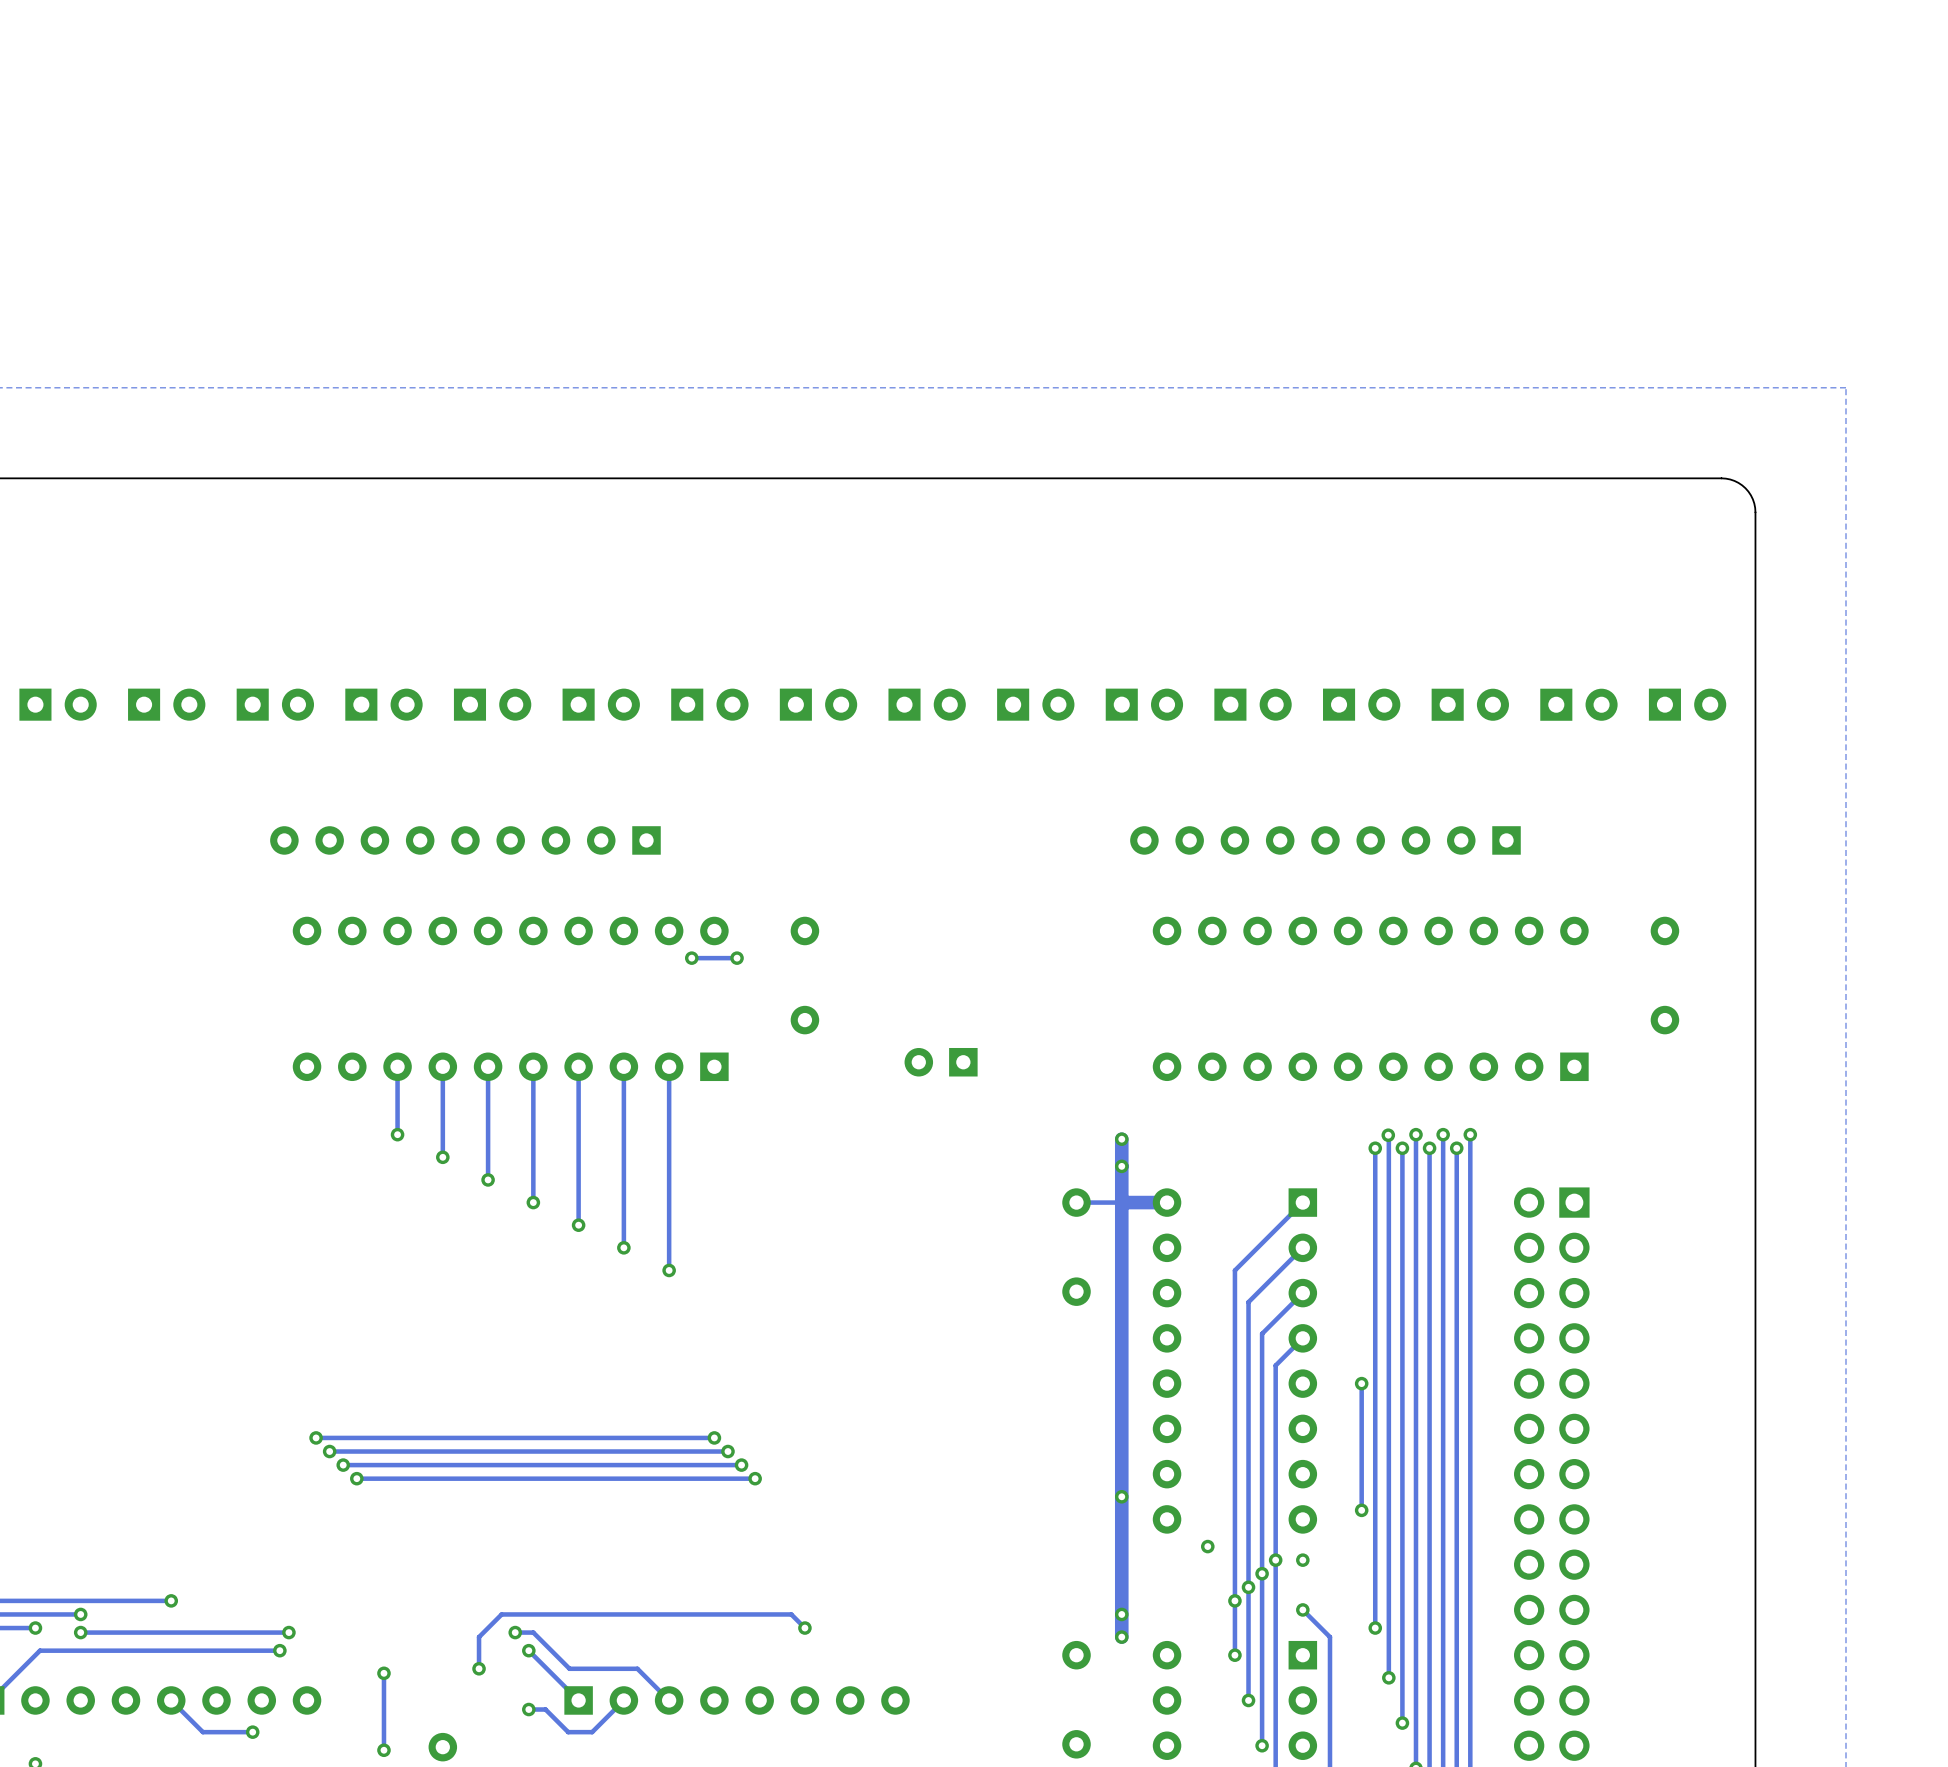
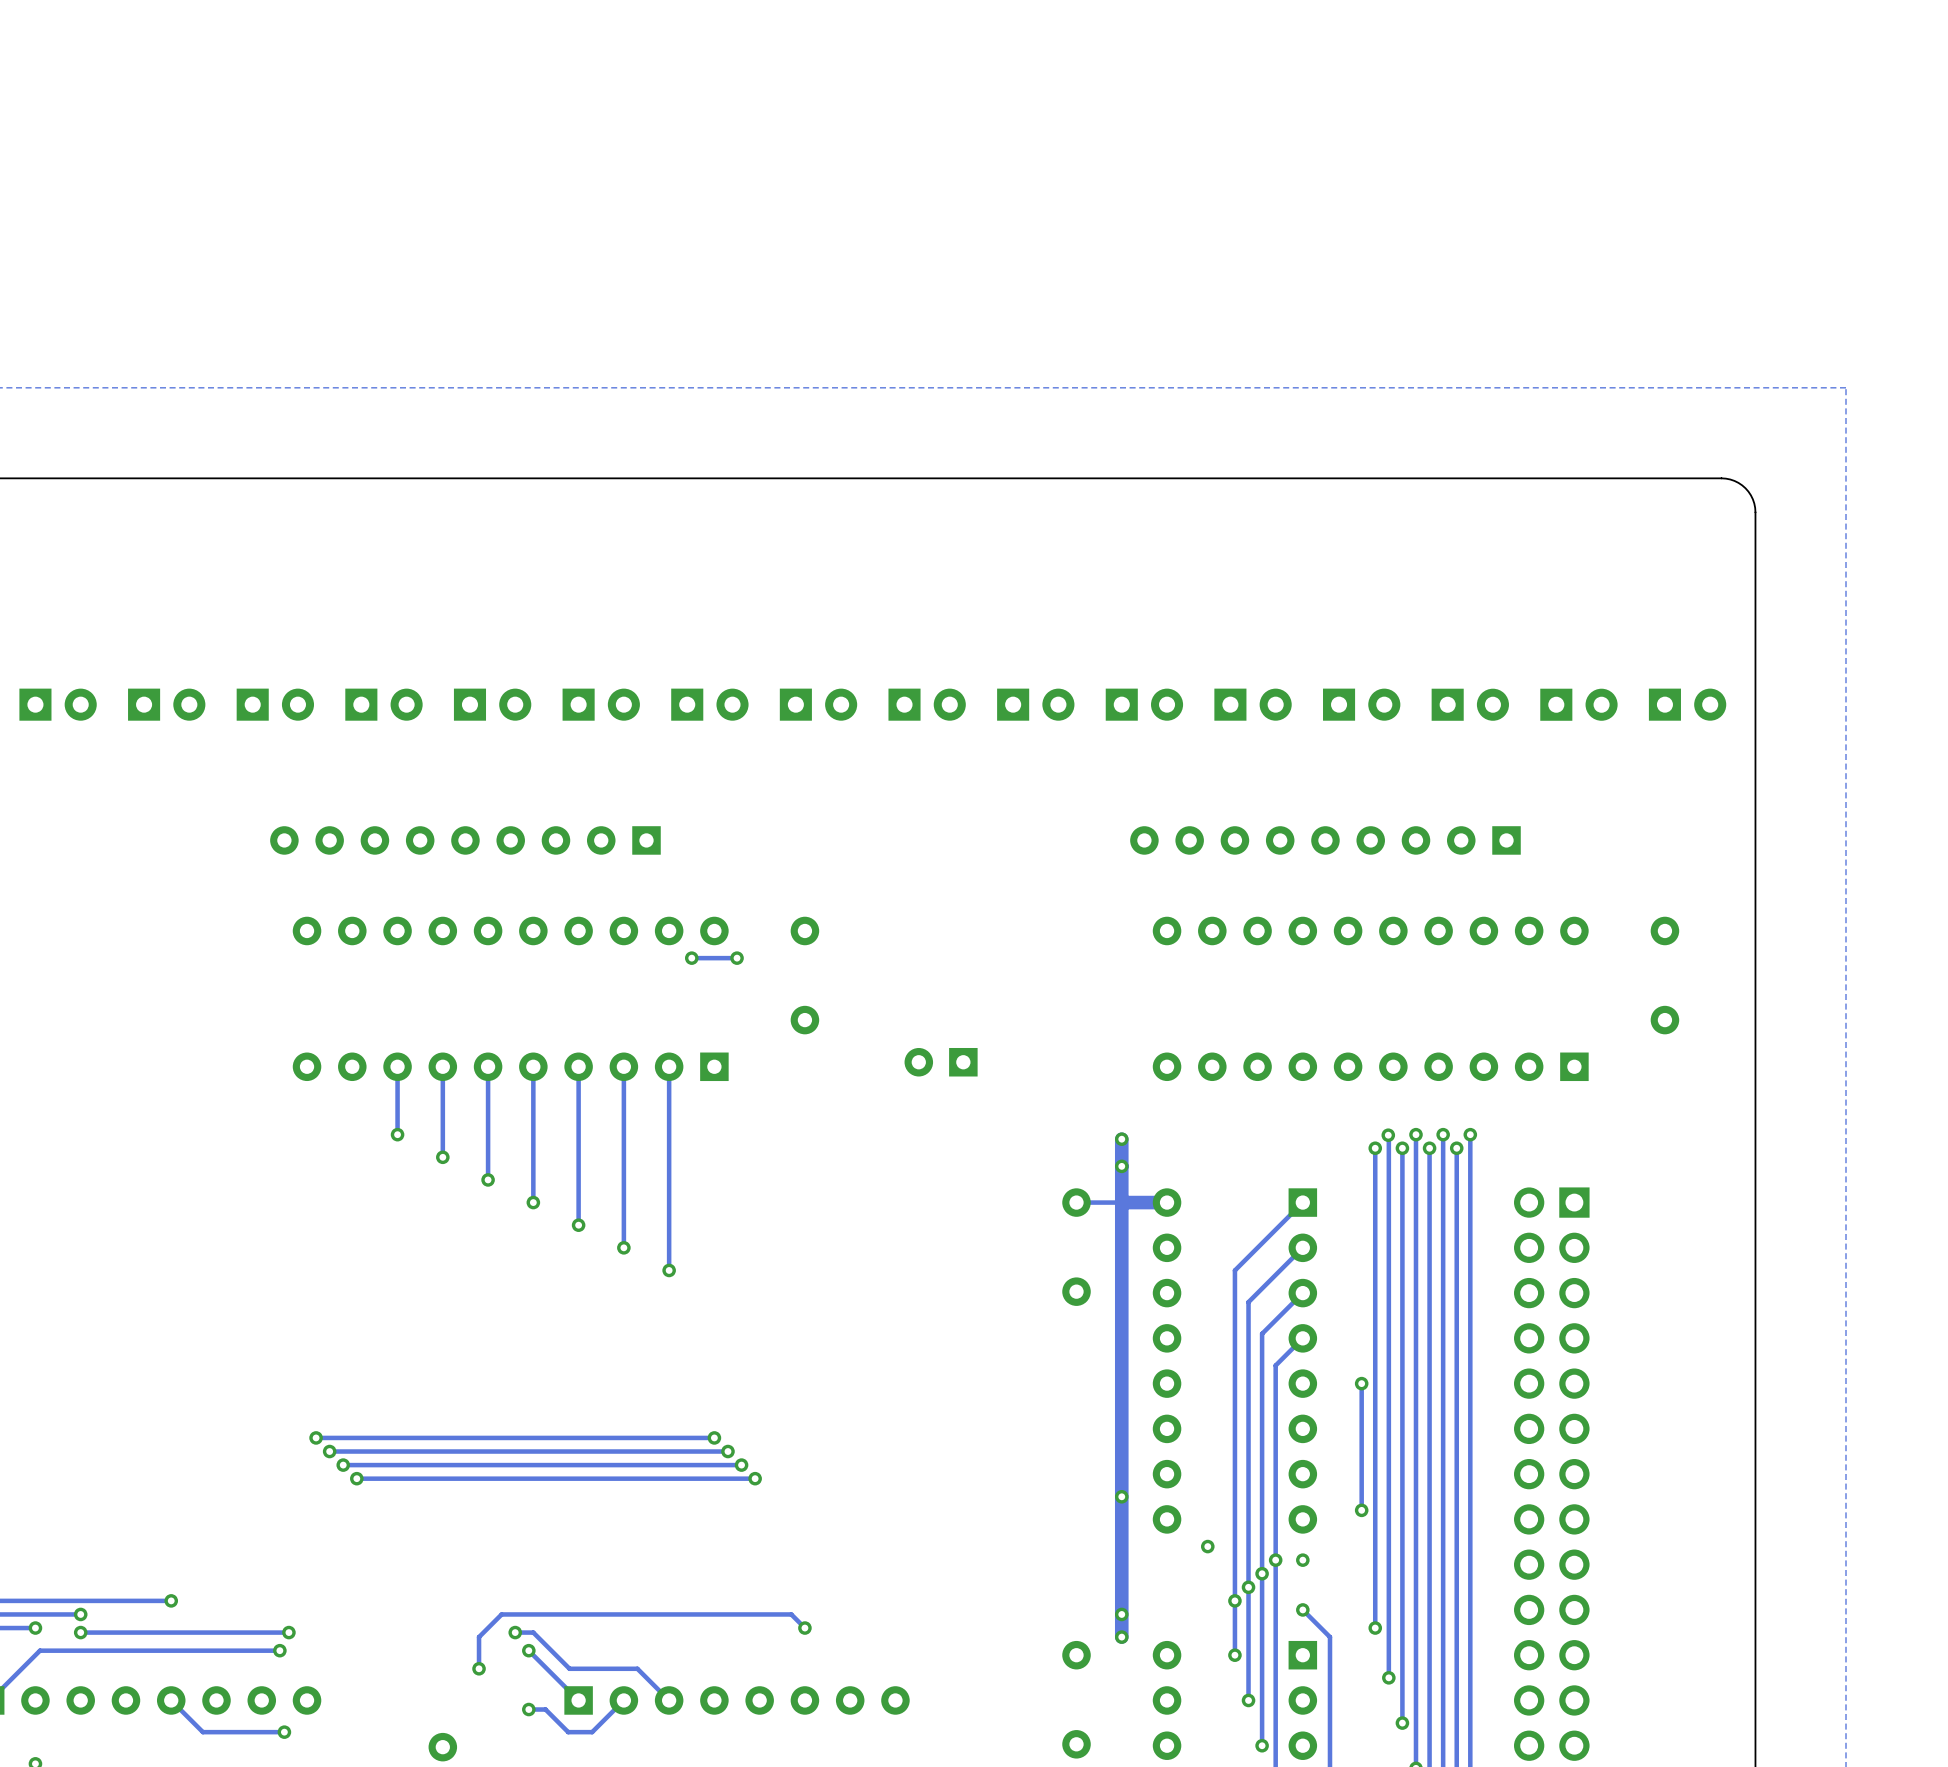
track: (383, 1673) (383, 1750) -> none
via: (383, 1673) -> none
via: (252, 1732) -> none
track: none -> (284, 1732) (252, 1732)
via: none -> (284, 1732)
via: (383, 1750) -> none

